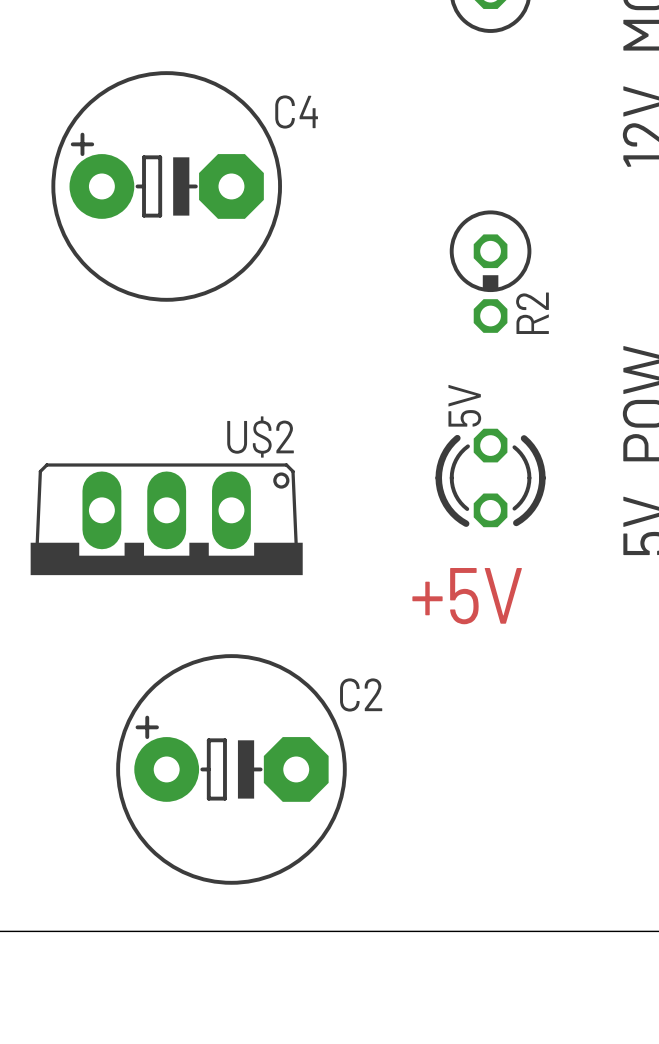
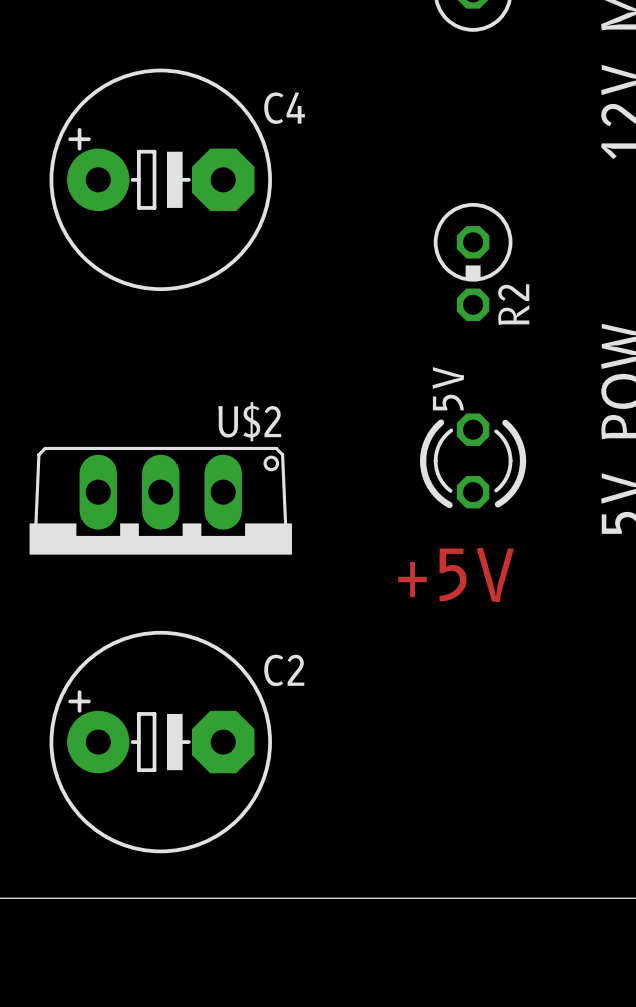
C2 position: (231, 769) -> (160, 742)

